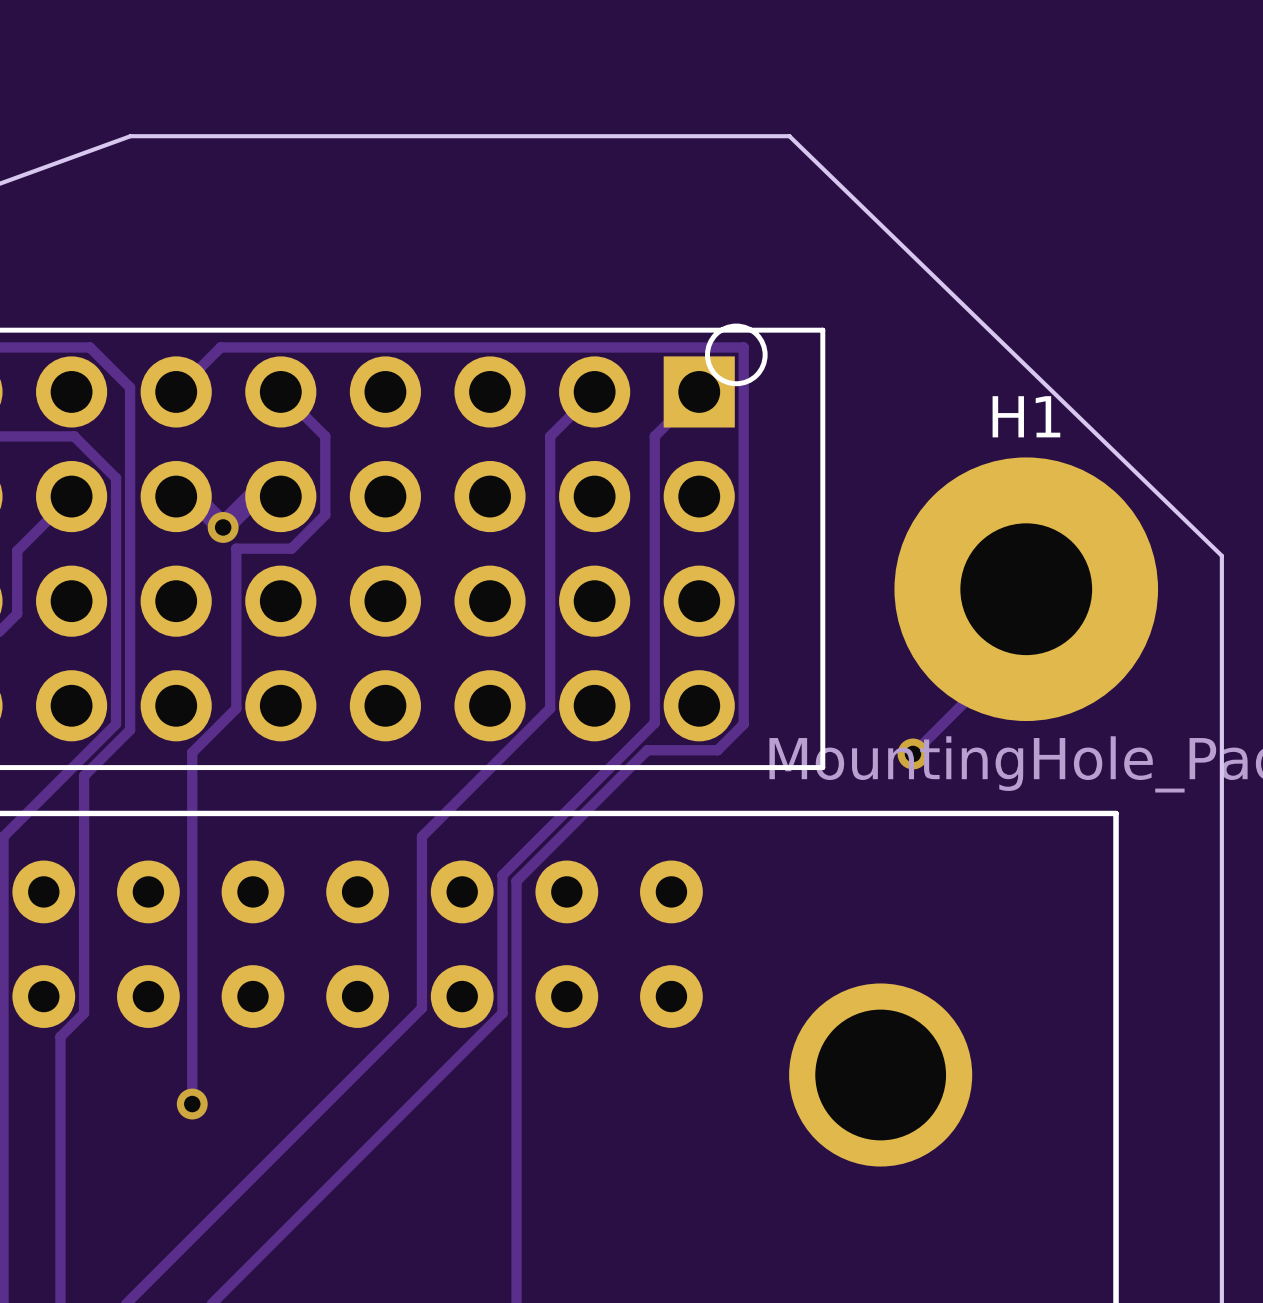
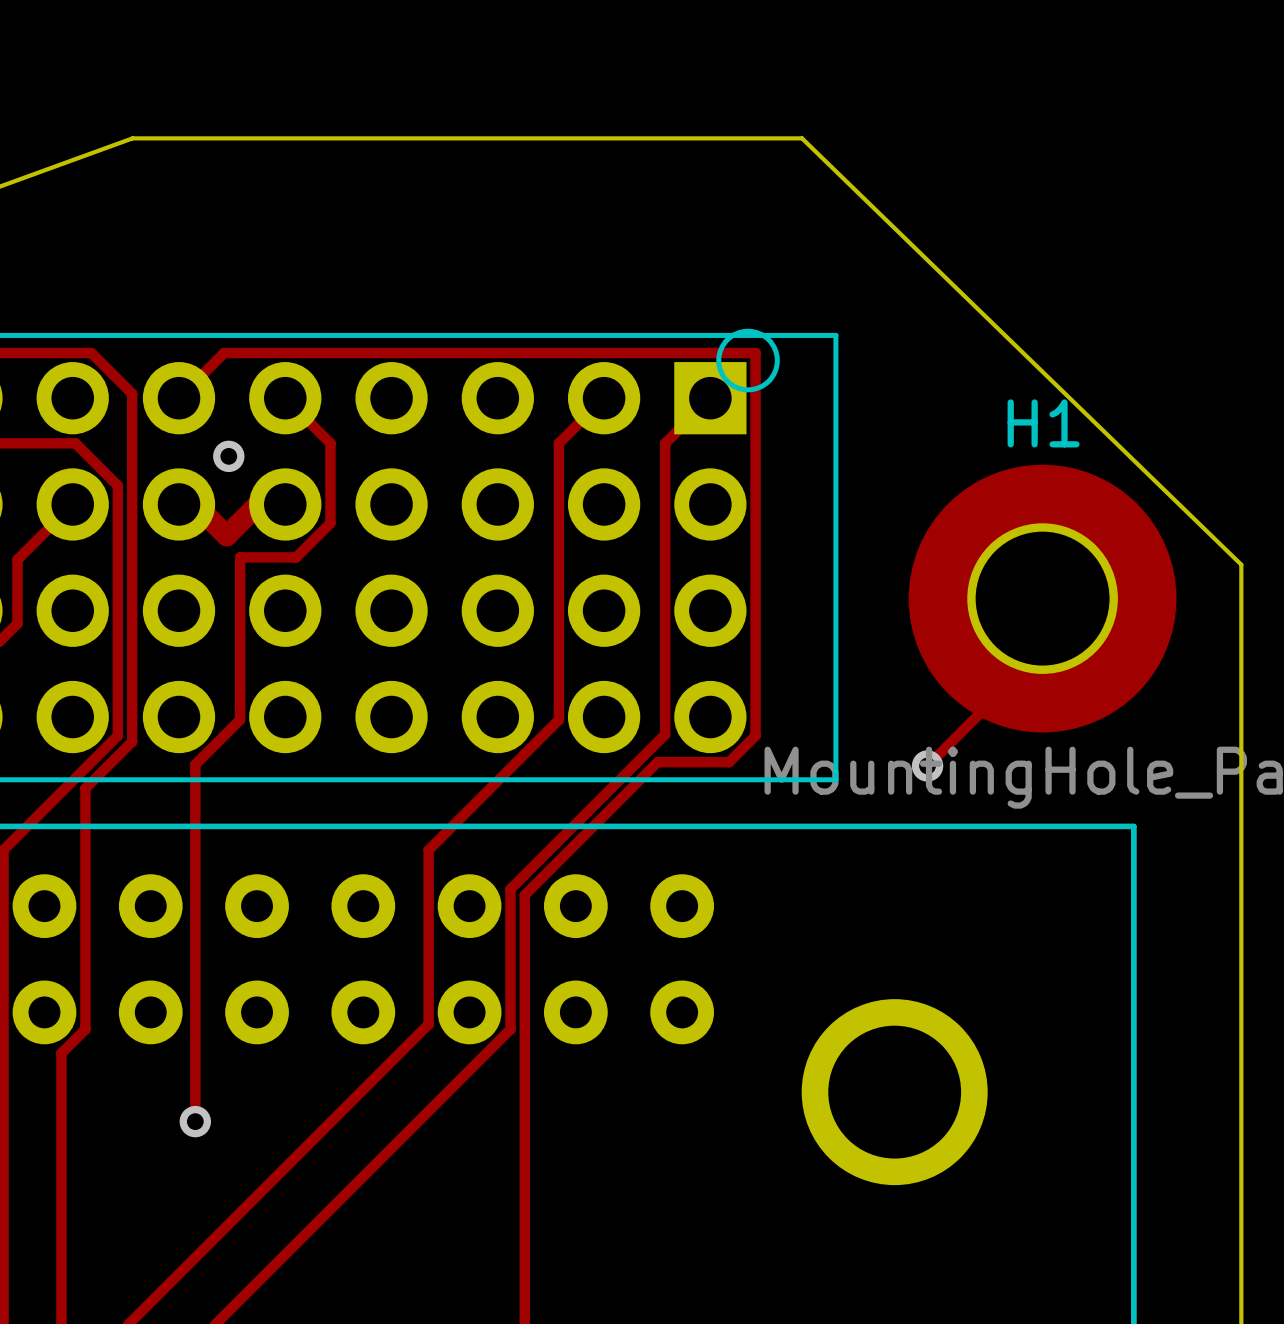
via position: (223, 527) -> (228, 456)

